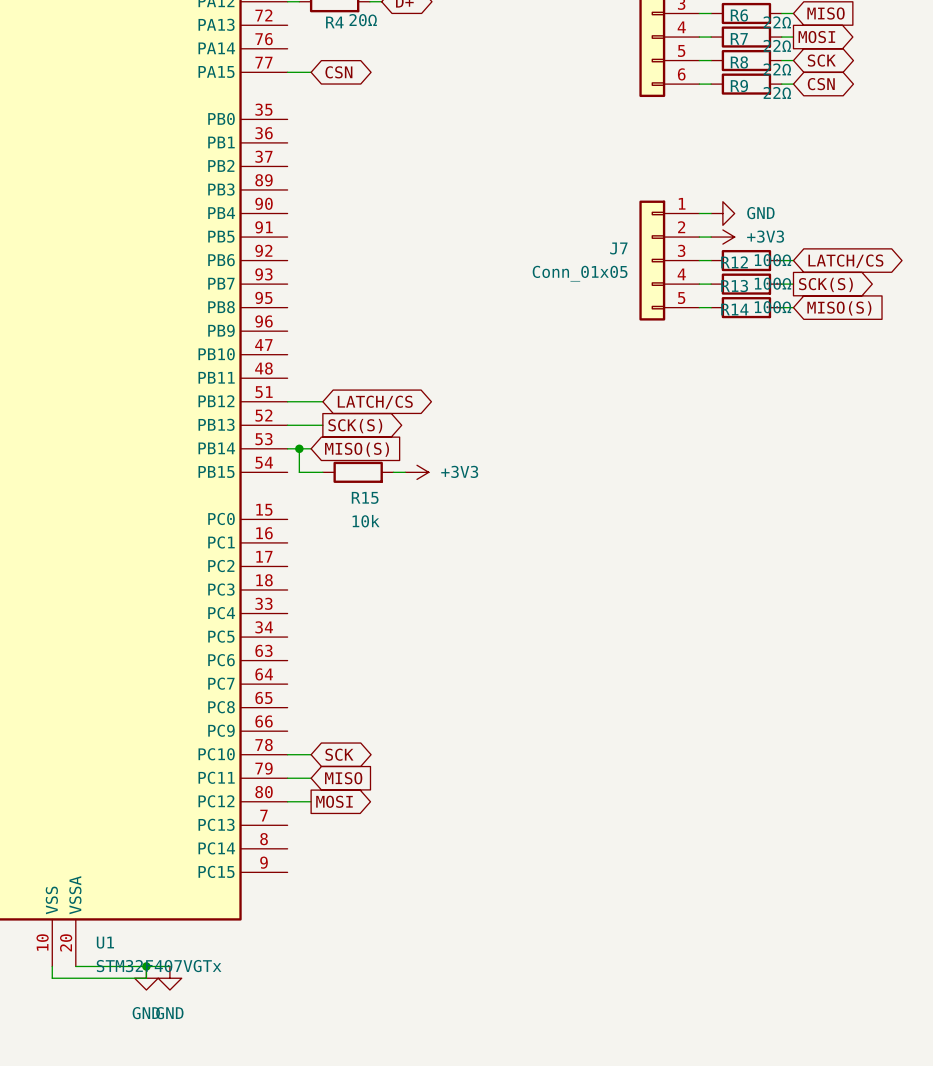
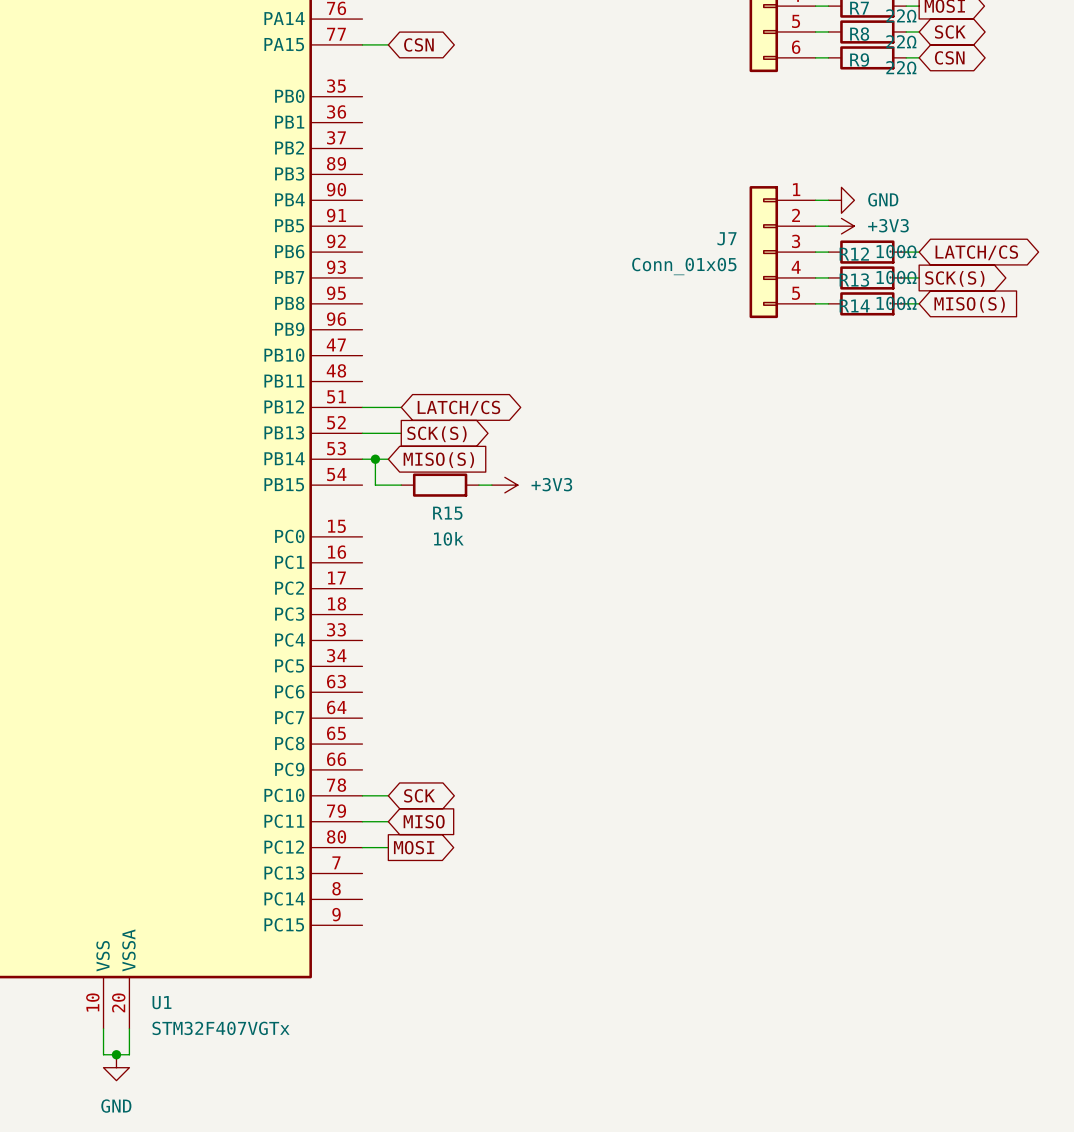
wire: (75, 966) (169, 966) -> none
wire: (146, 966) (146, 978) (52, 978) -> (129, 1028) (129, 1054) (103, 1054) (103, 1041)
junction: (146, 966) -> none
power symbol: GND (146, 978) -> none
power symbol: GND (169, 978) -> none
junction: none -> (116, 1054)
power symbol: none -> GND (116, 1067)

